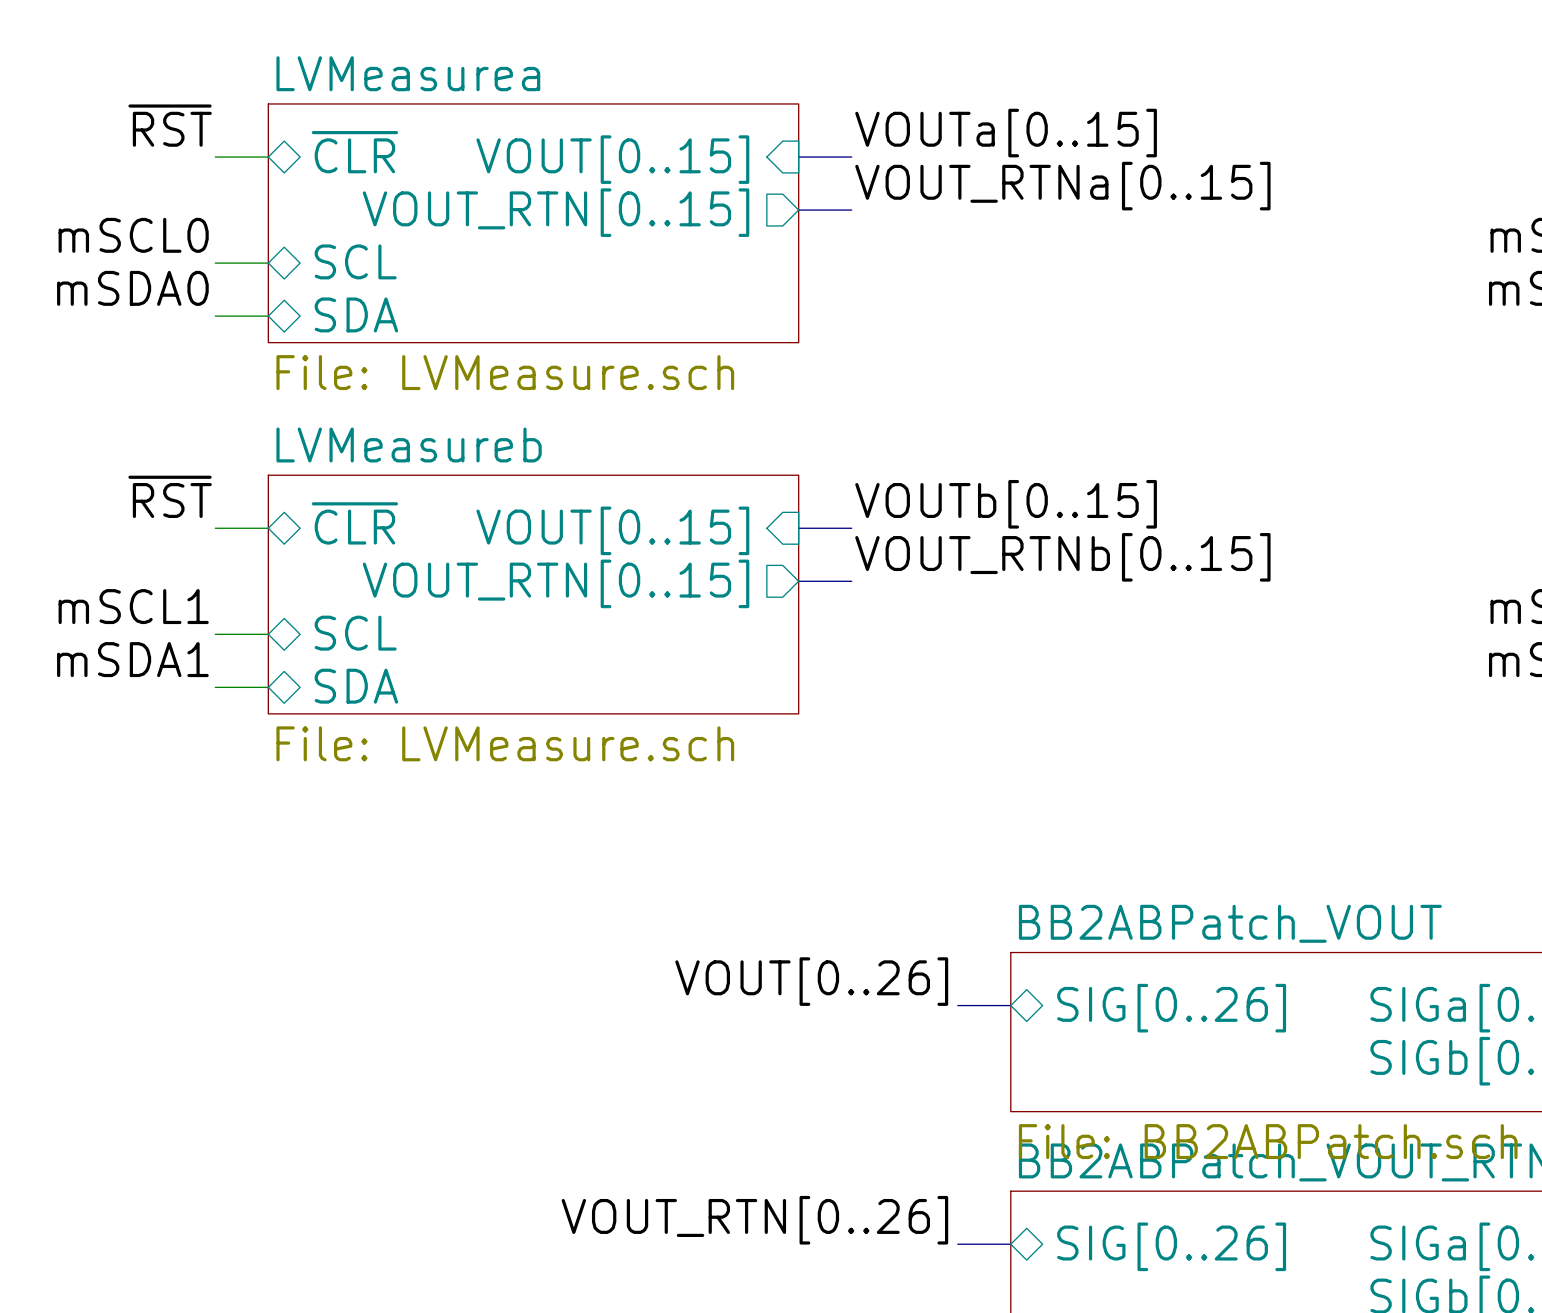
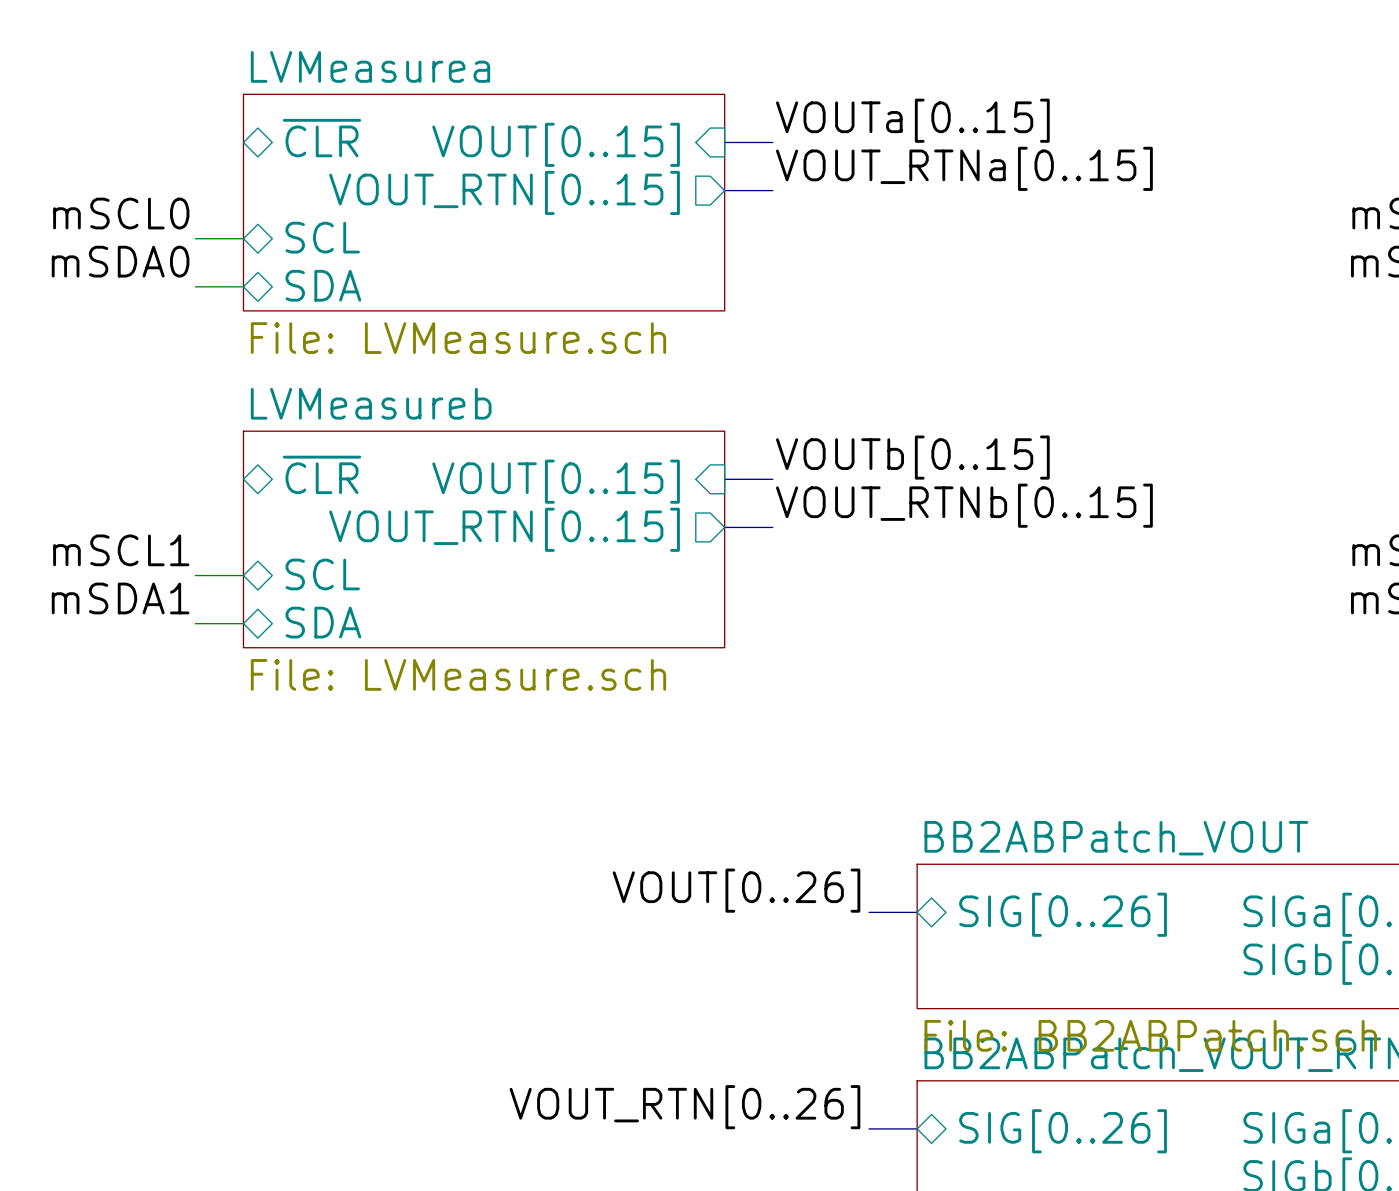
label: ~{RST} (170, 125) -> none
wire: (215, 157) (268, 157) -> none
label: ~{RST} (170, 496) -> none
wire: (215, 528) (268, 528) -> none

